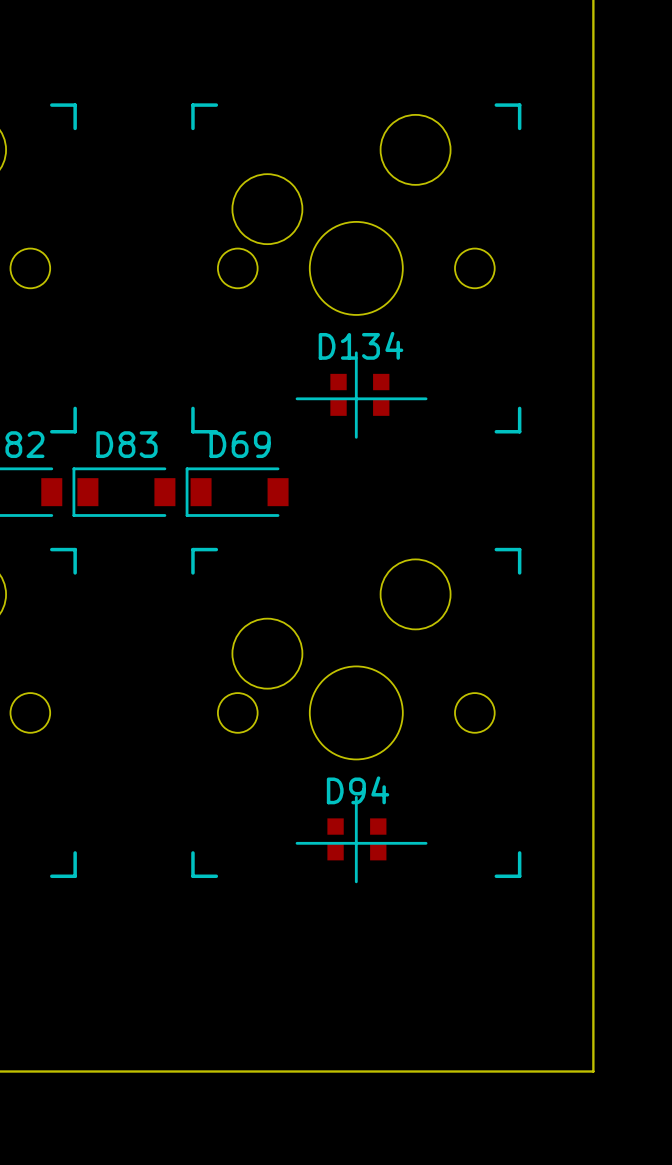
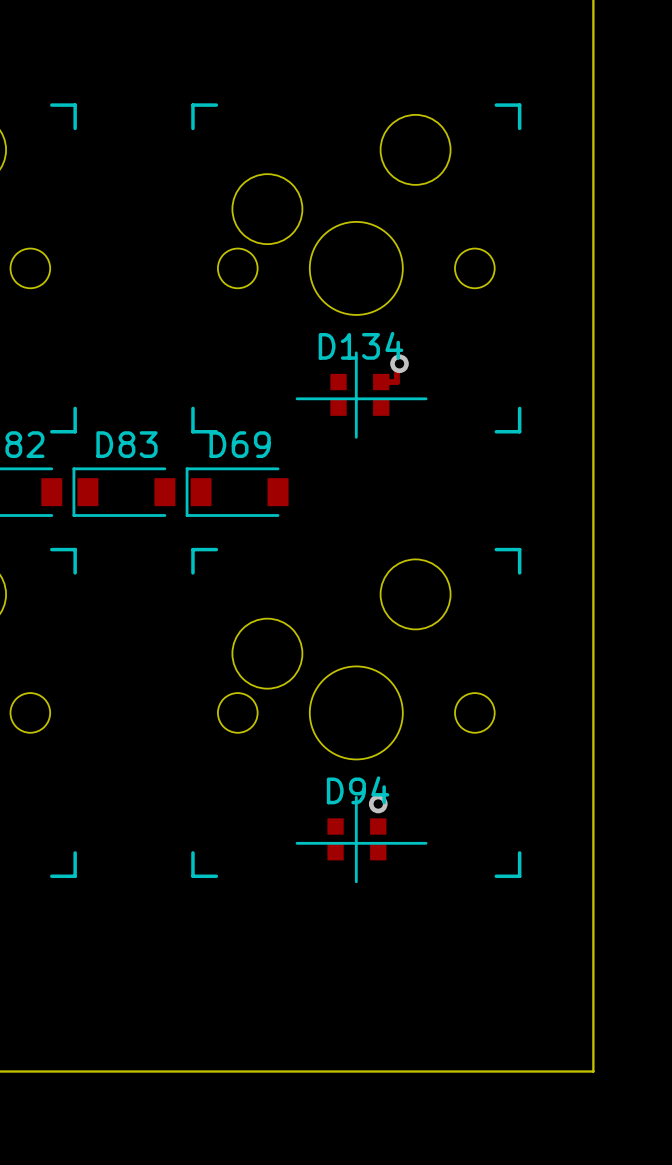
track: none -> (399, 363) (396, 366) (396, 382) (381, 382)
via: none -> (399, 363)
via: none -> (378, 803)

